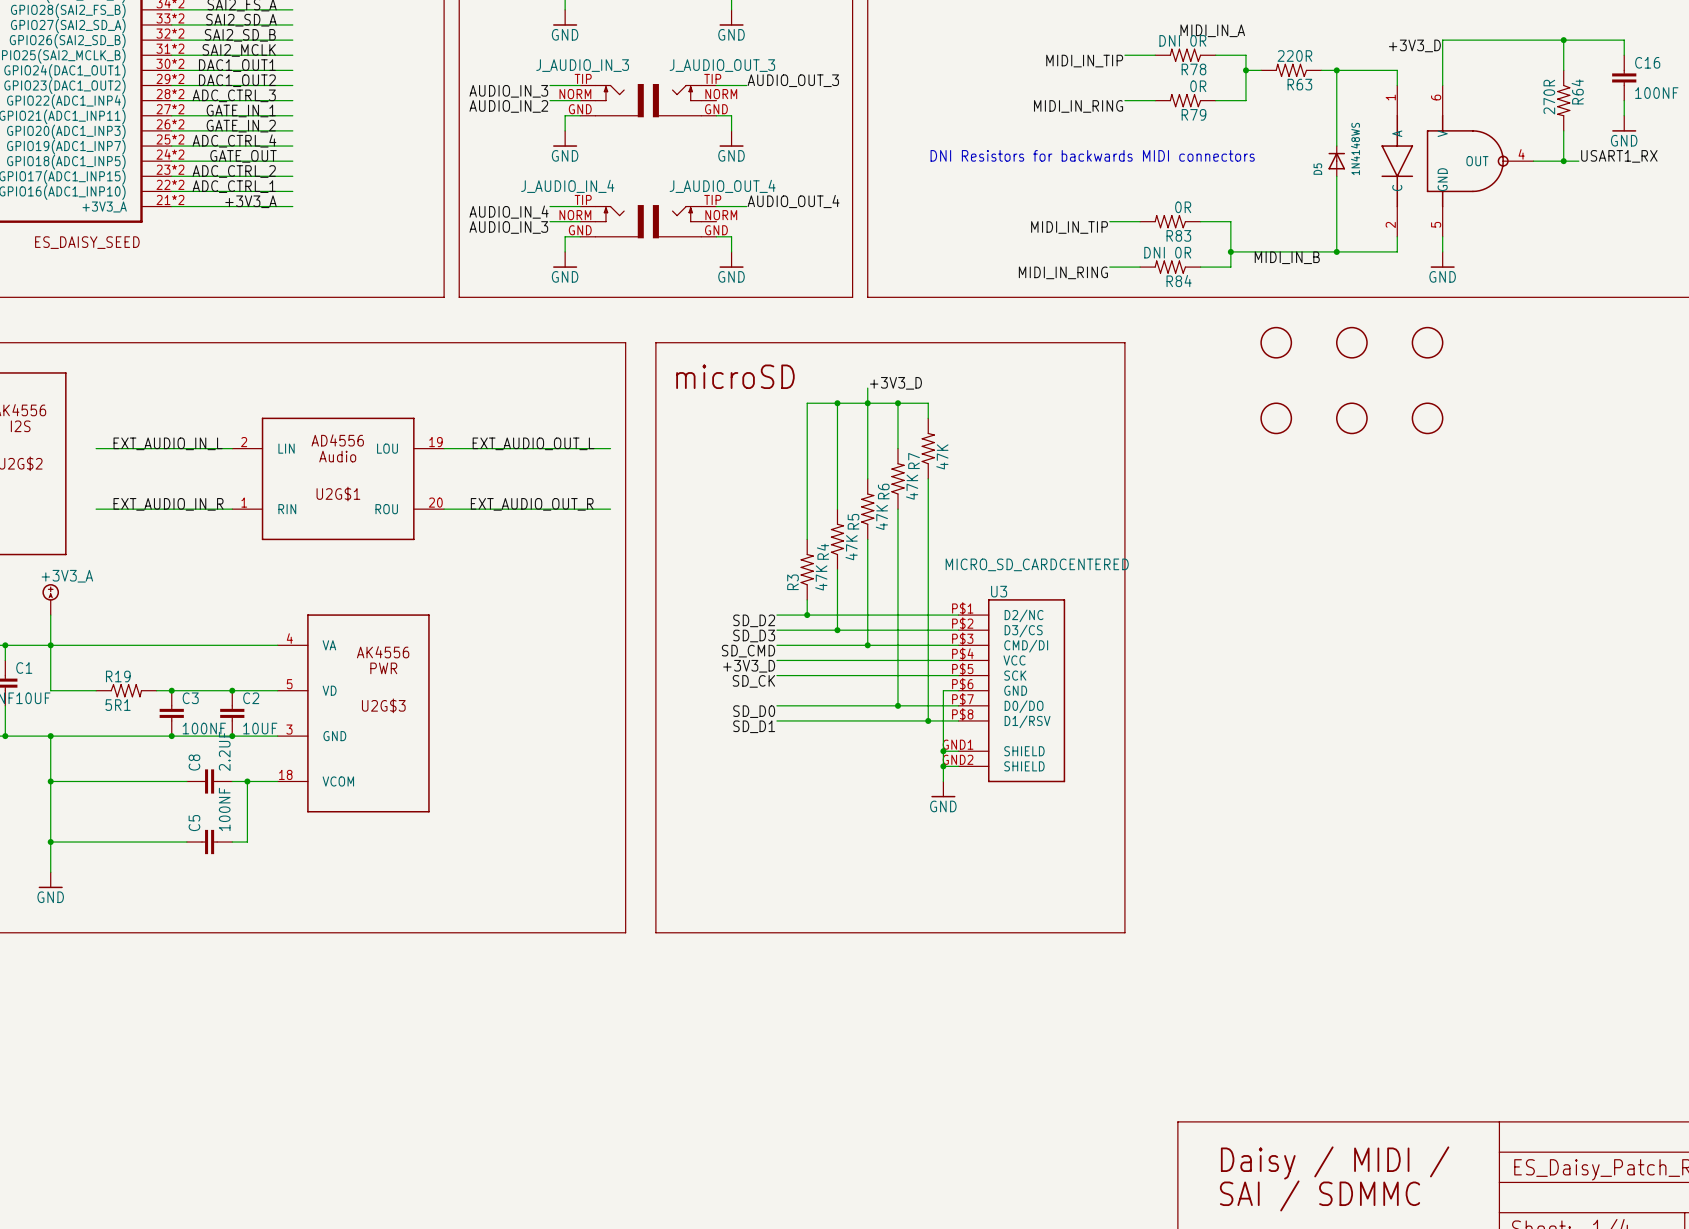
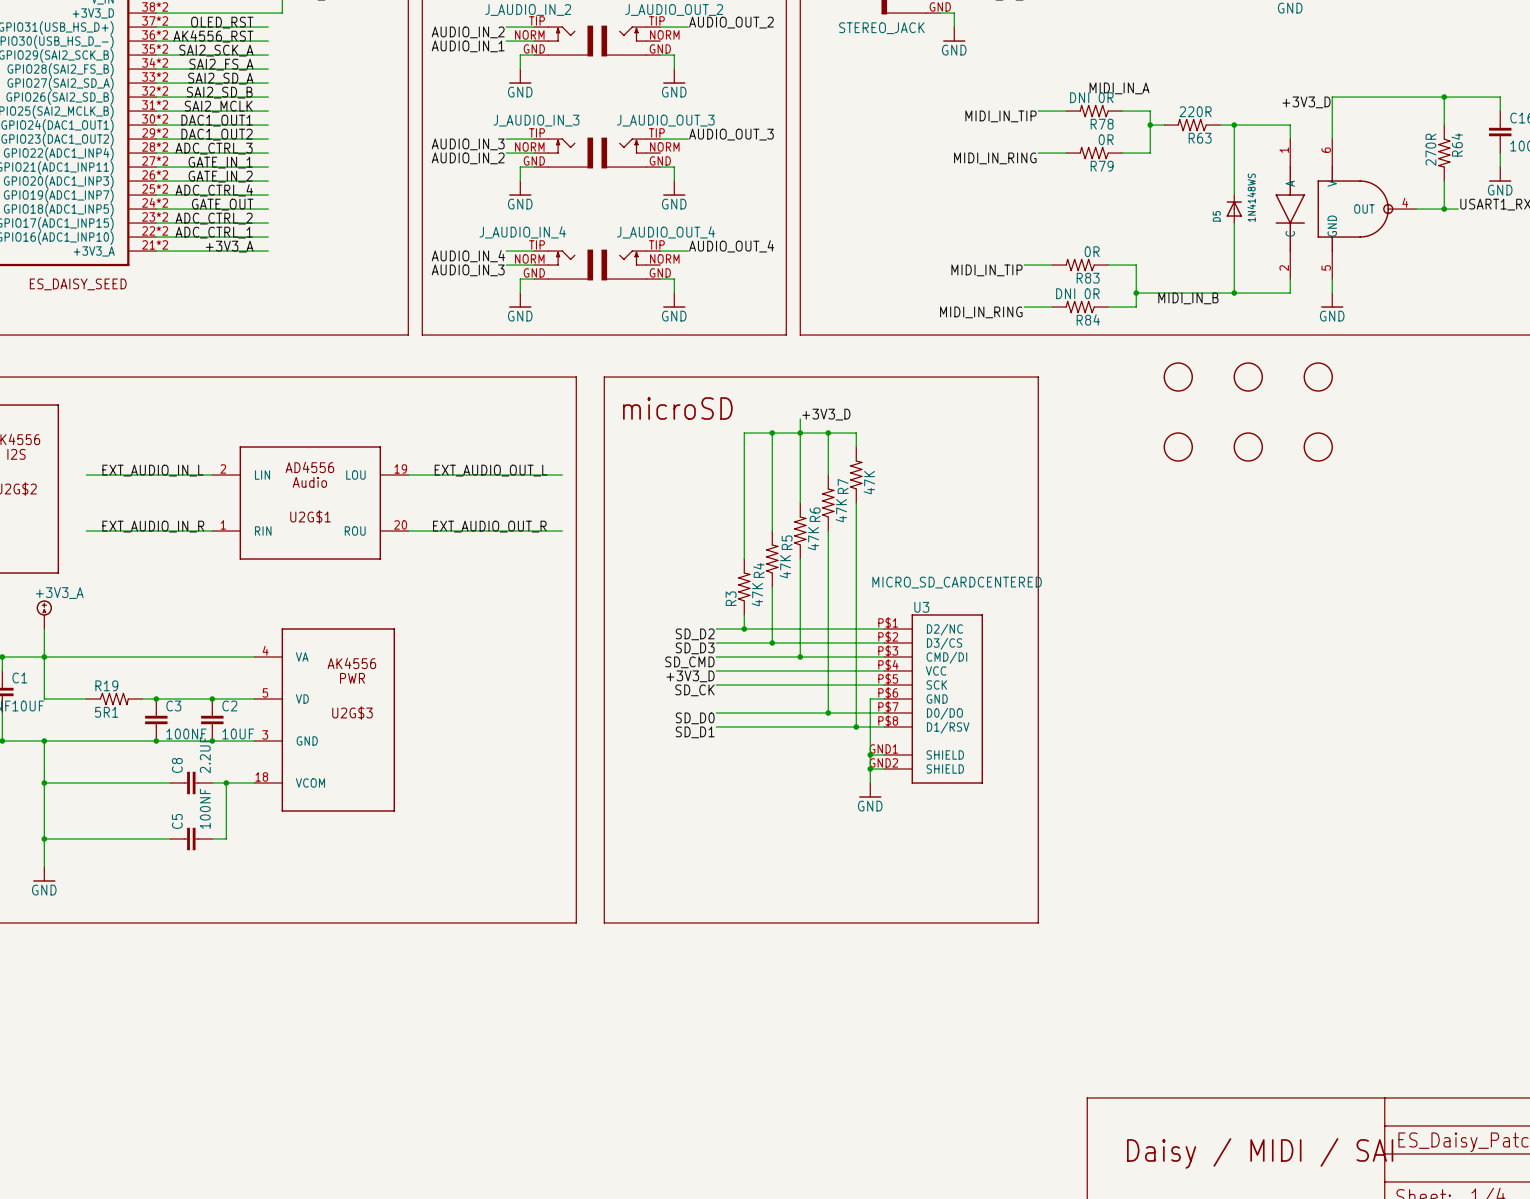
text: DNI Resistors for backwards MIDI connectors (1092, 155) -> none
text: Daisy / MIDI / (1335, 1162) -> Daisy / MIDI / SAI (1260, 1153)
text: SAI / SDMMC (1320, 1195) -> none

